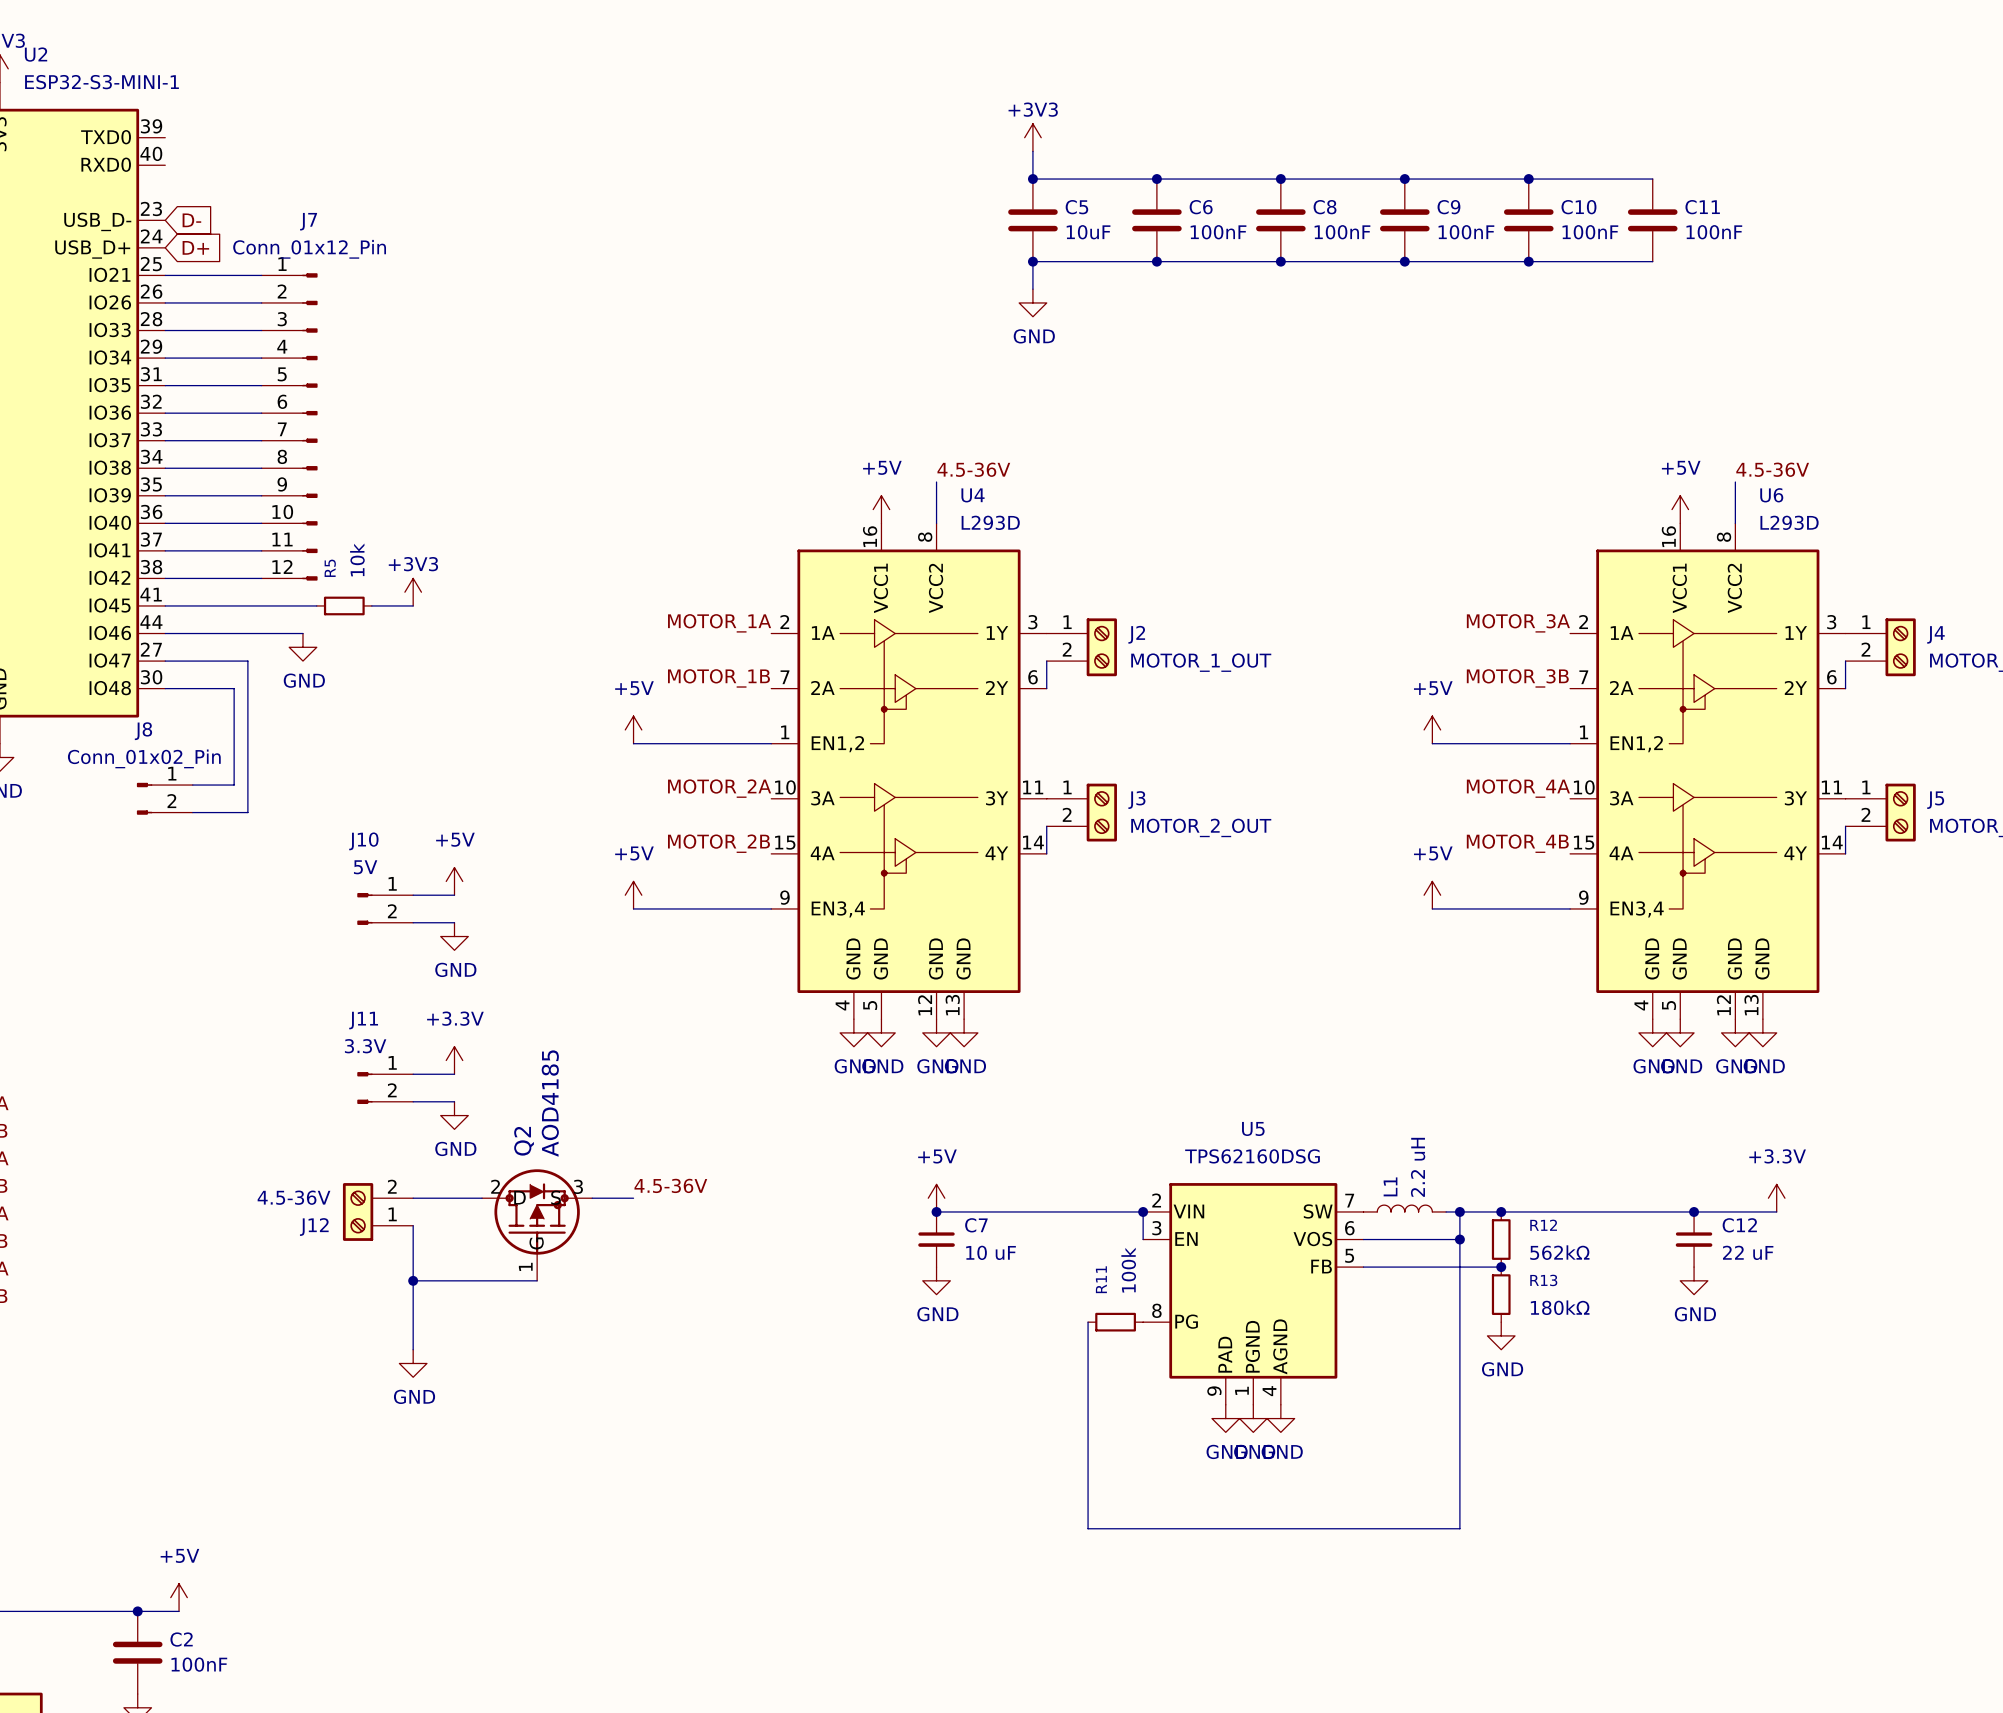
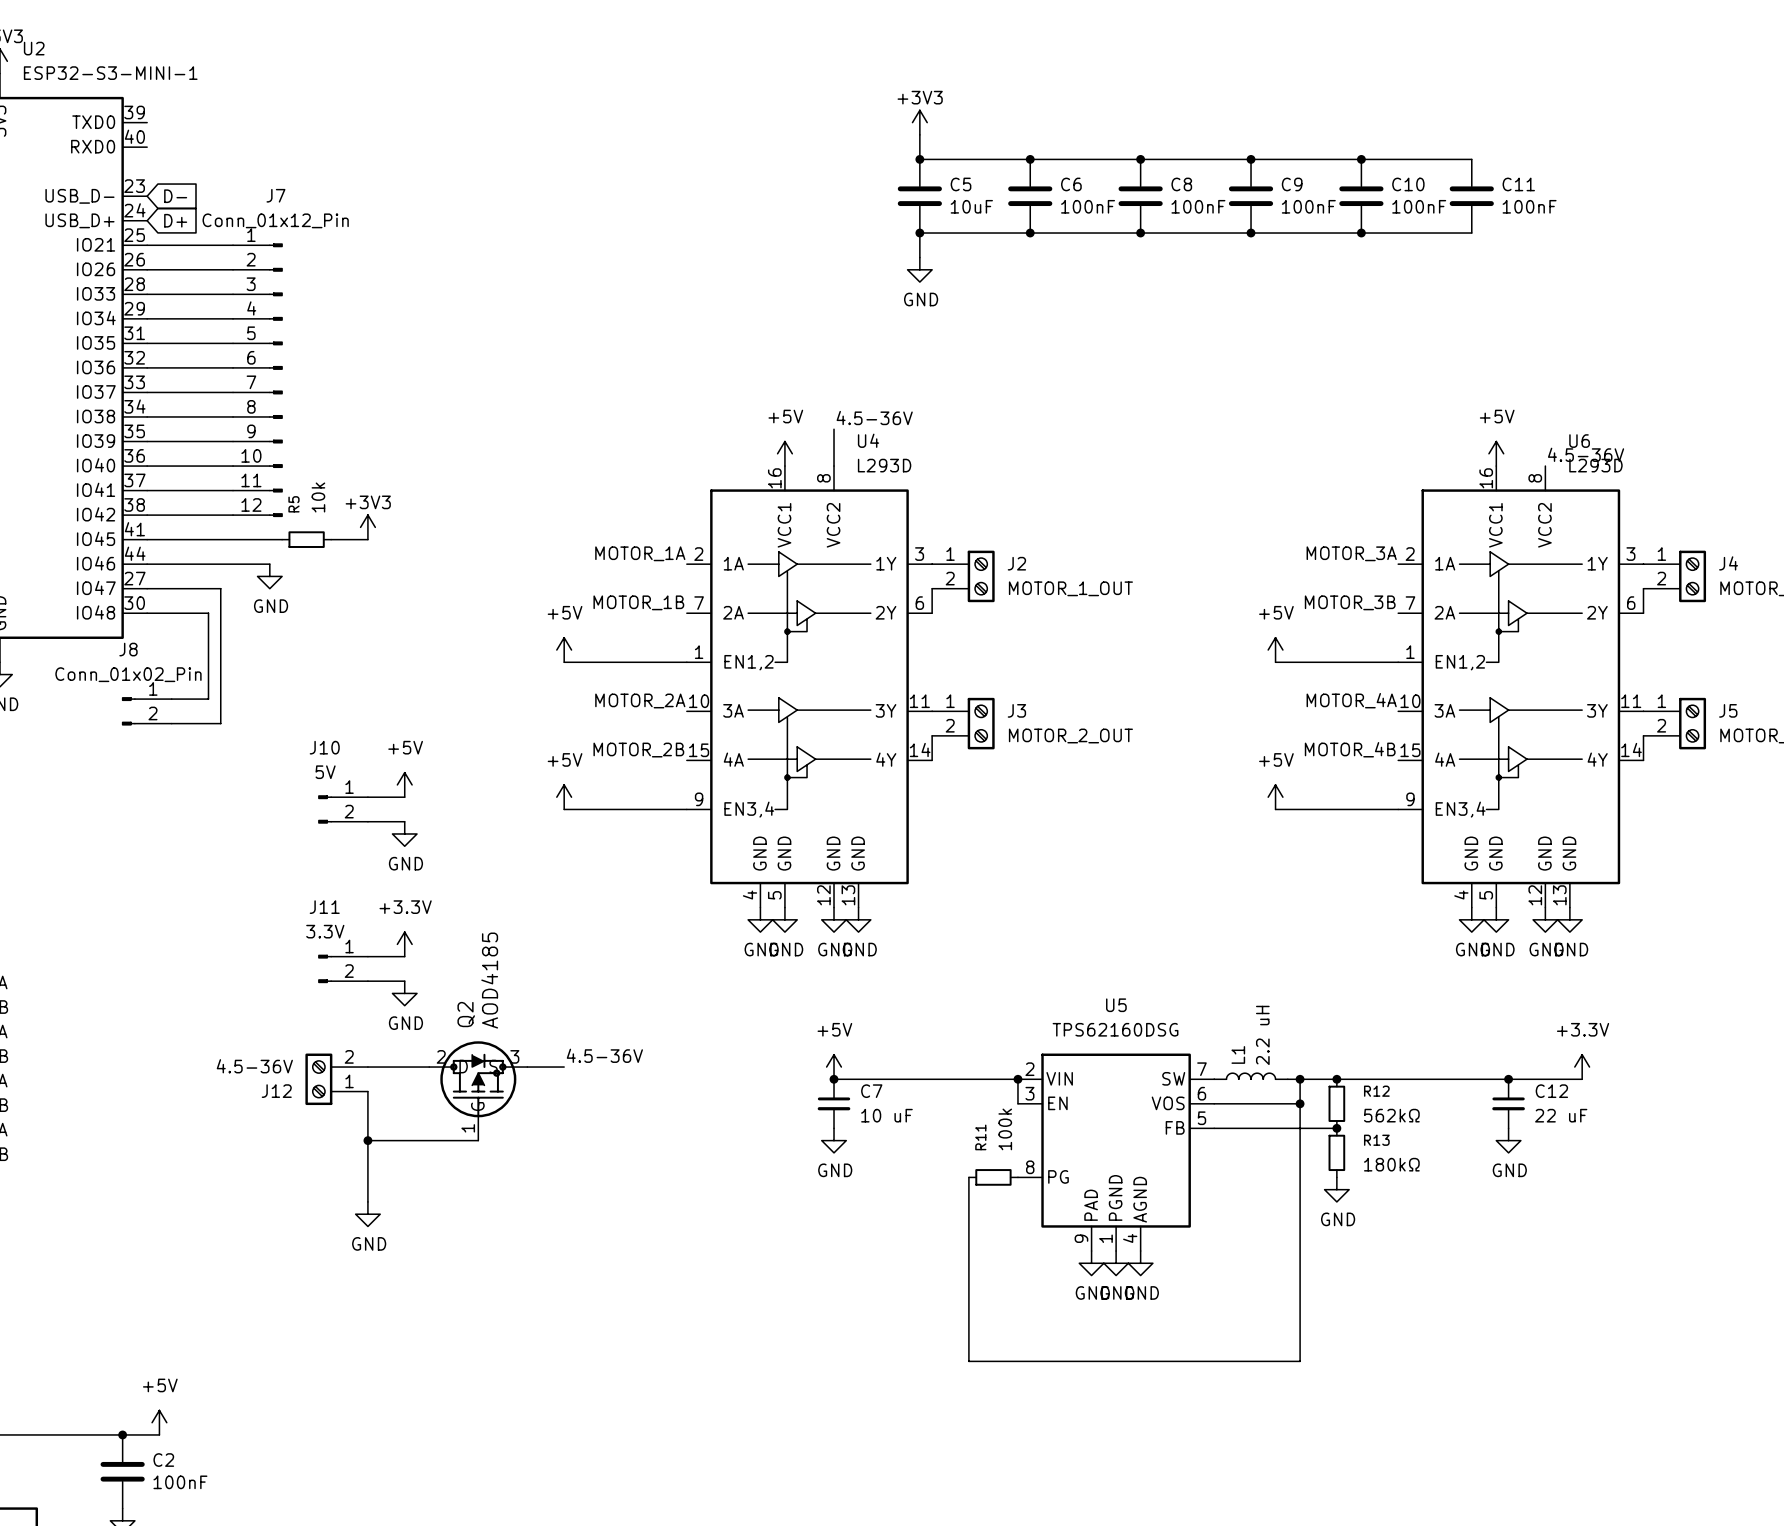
label position: 4.5-36V (1772, 469) -> 4.5-36V (1586, 454)
wire: (1735, 482) (1735, 523) -> none

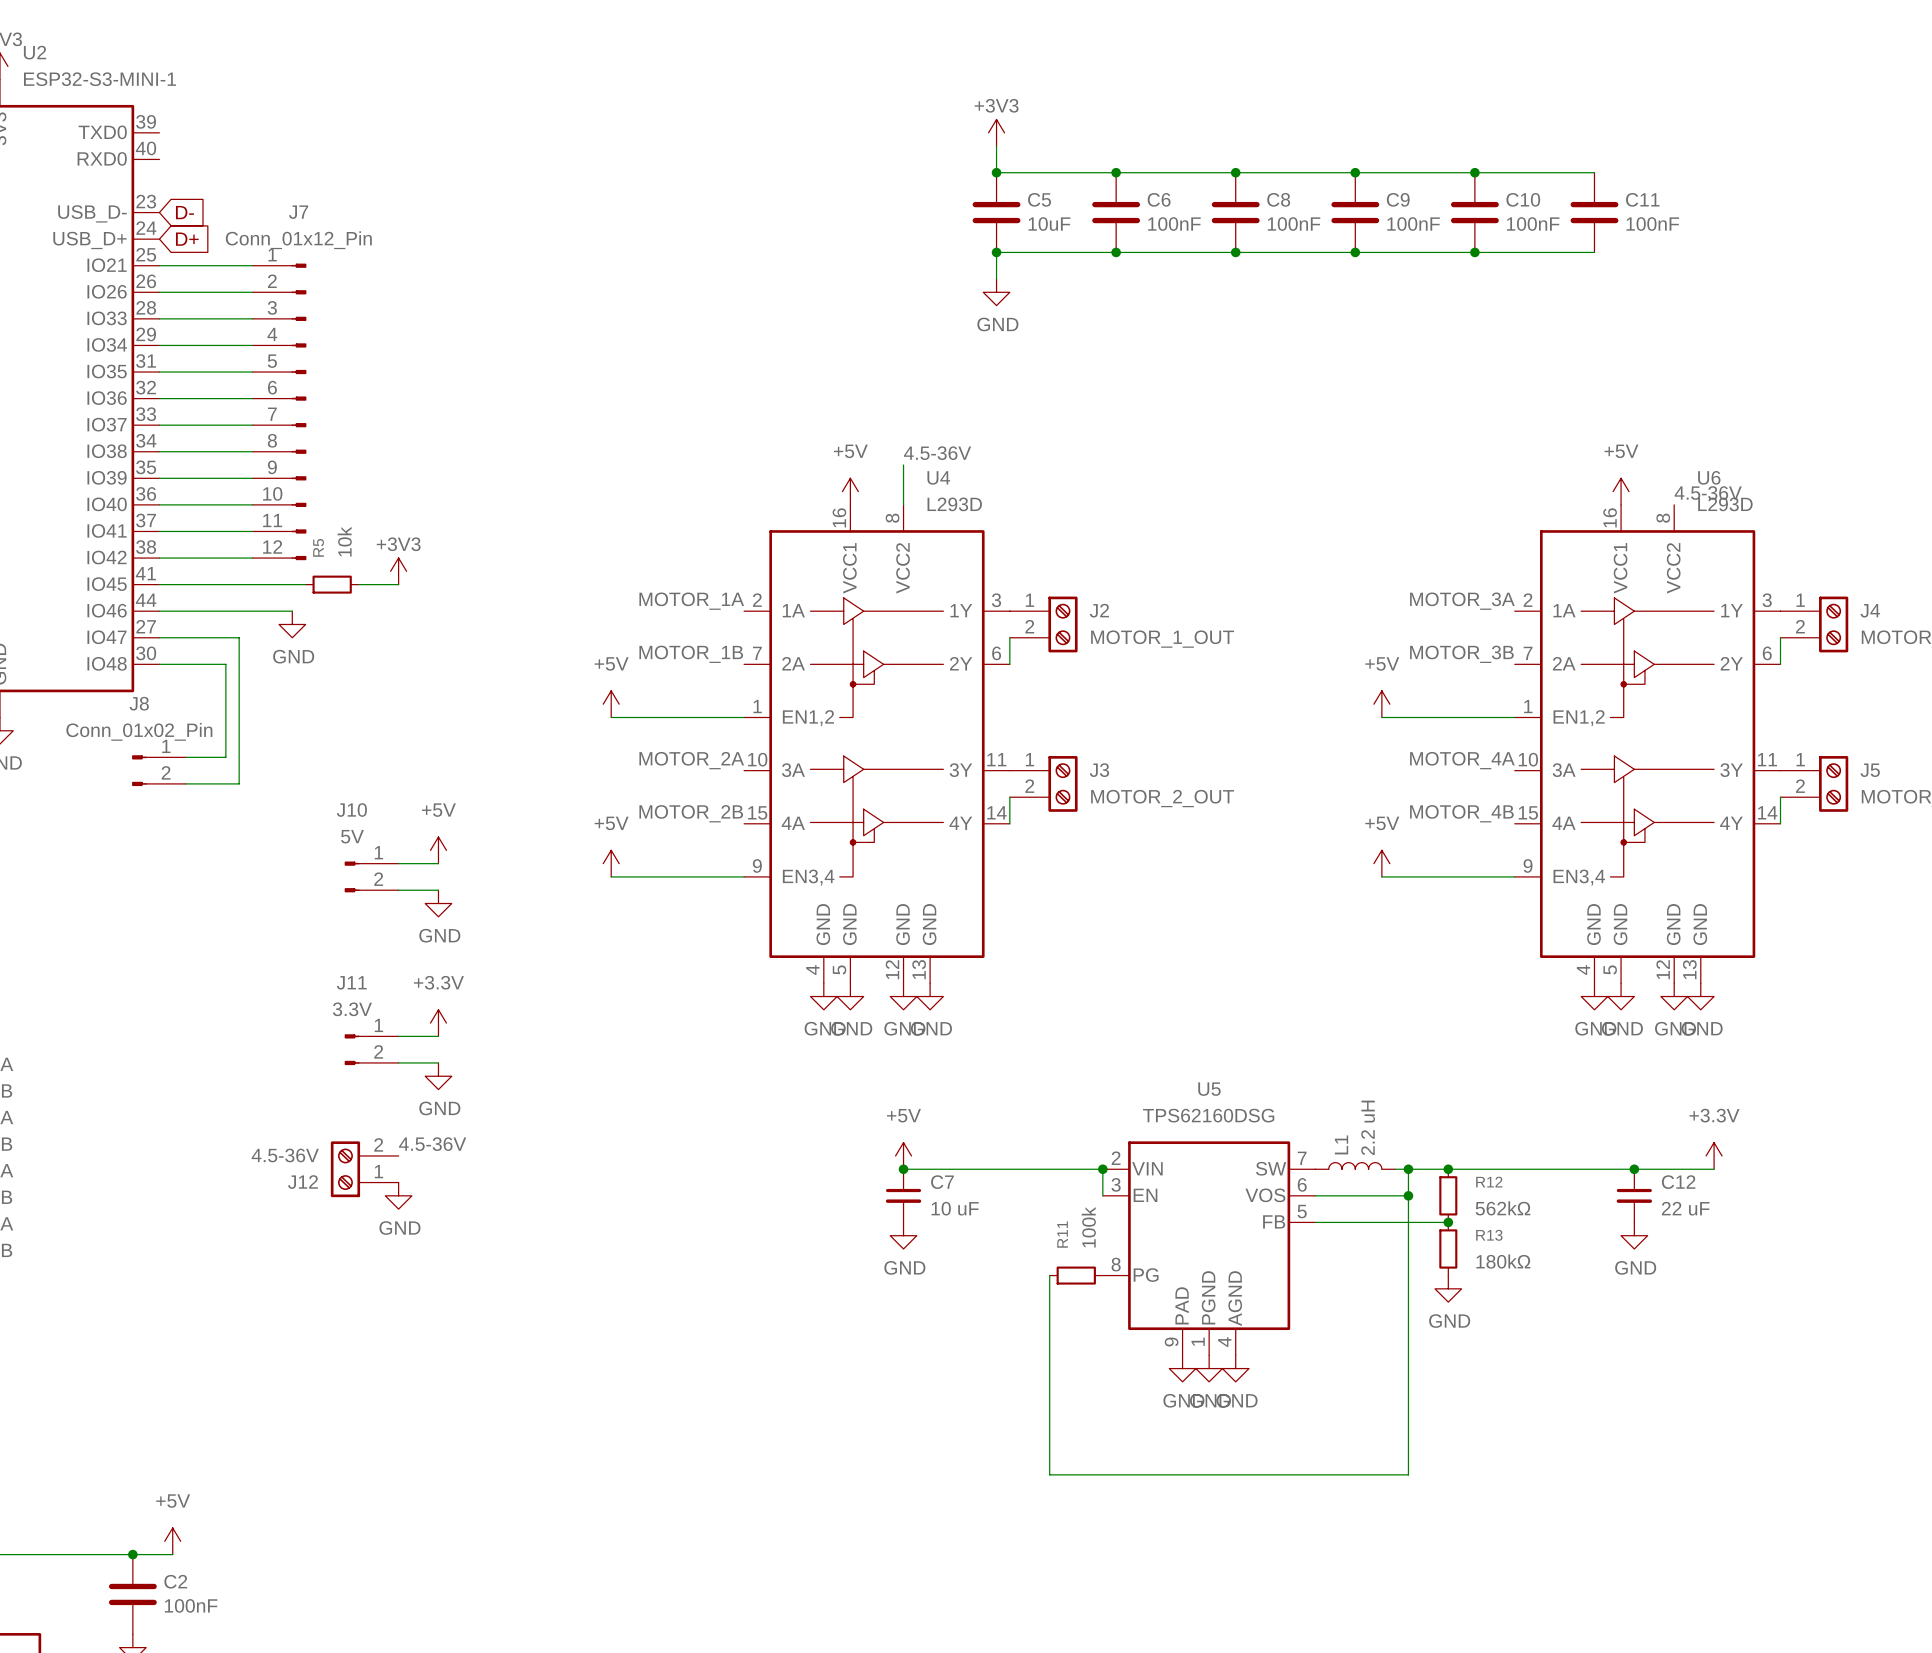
label position: 4.5-36V (604, 1055) -> 4.5-36V (432, 1144)
wire: (367, 1067) (429, 1067) -> none
wire: (527, 1067) (564, 1067) -> none
Q2: AOD4185 (478, 1090) -> none
wire: (367, 1091) (367, 1201) -> none
wire: (367, 1140) (478, 1140) -> none
junction: (367, 1140) -> none
power symbol position: GND (367, 1214) -> GND (398, 1195)

